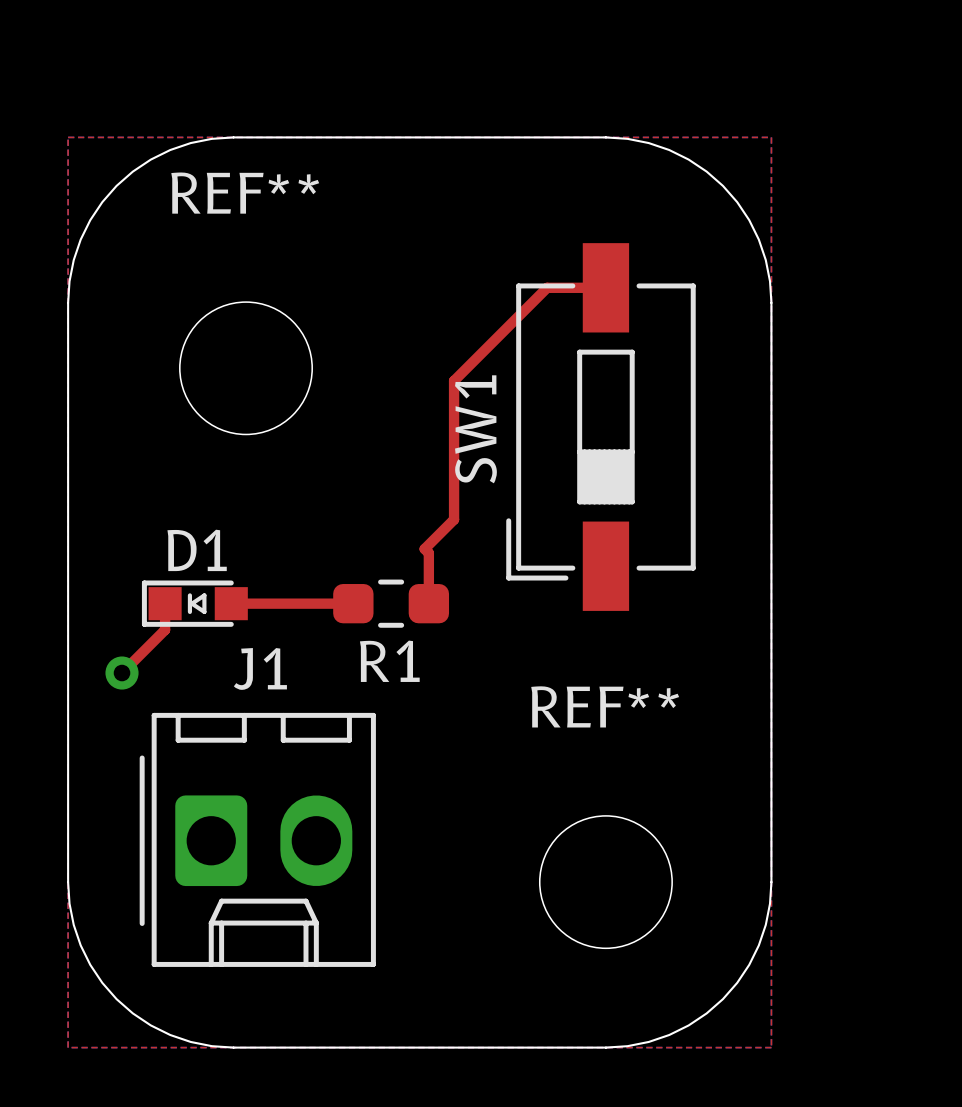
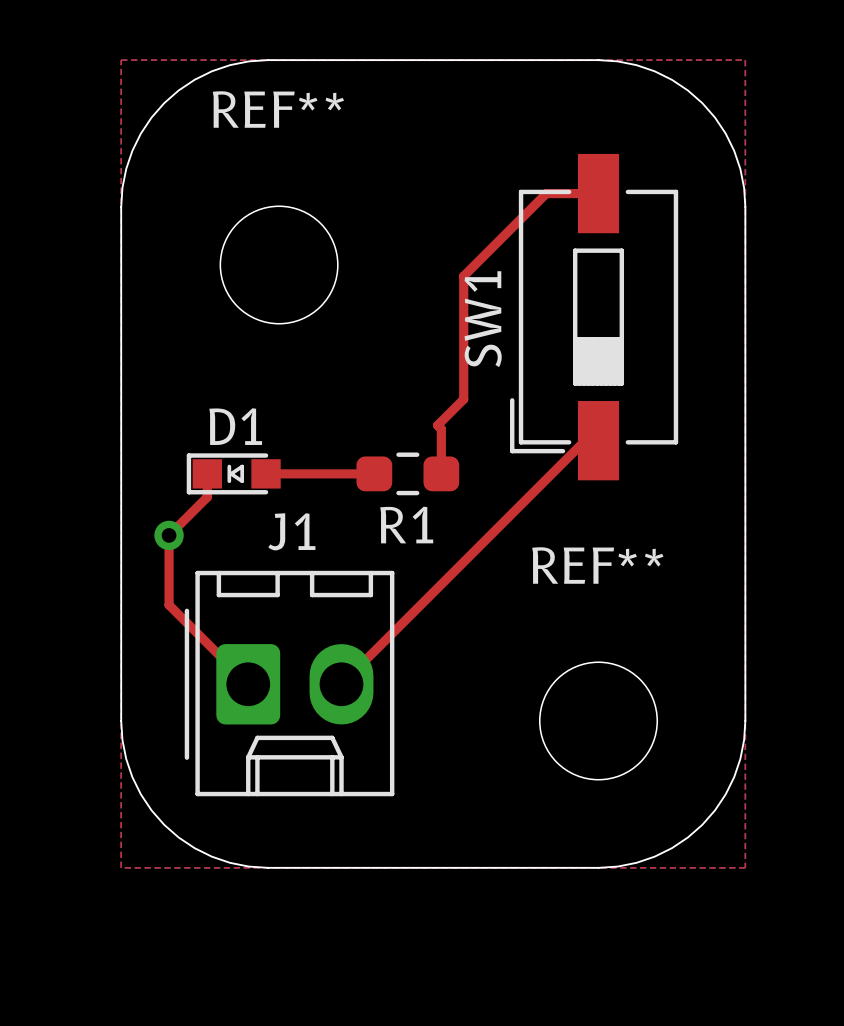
top track: none -> (598, 440) (585, 440) (341, 684)
top track: none -> (169, 535) (169, 605) (248, 684)

